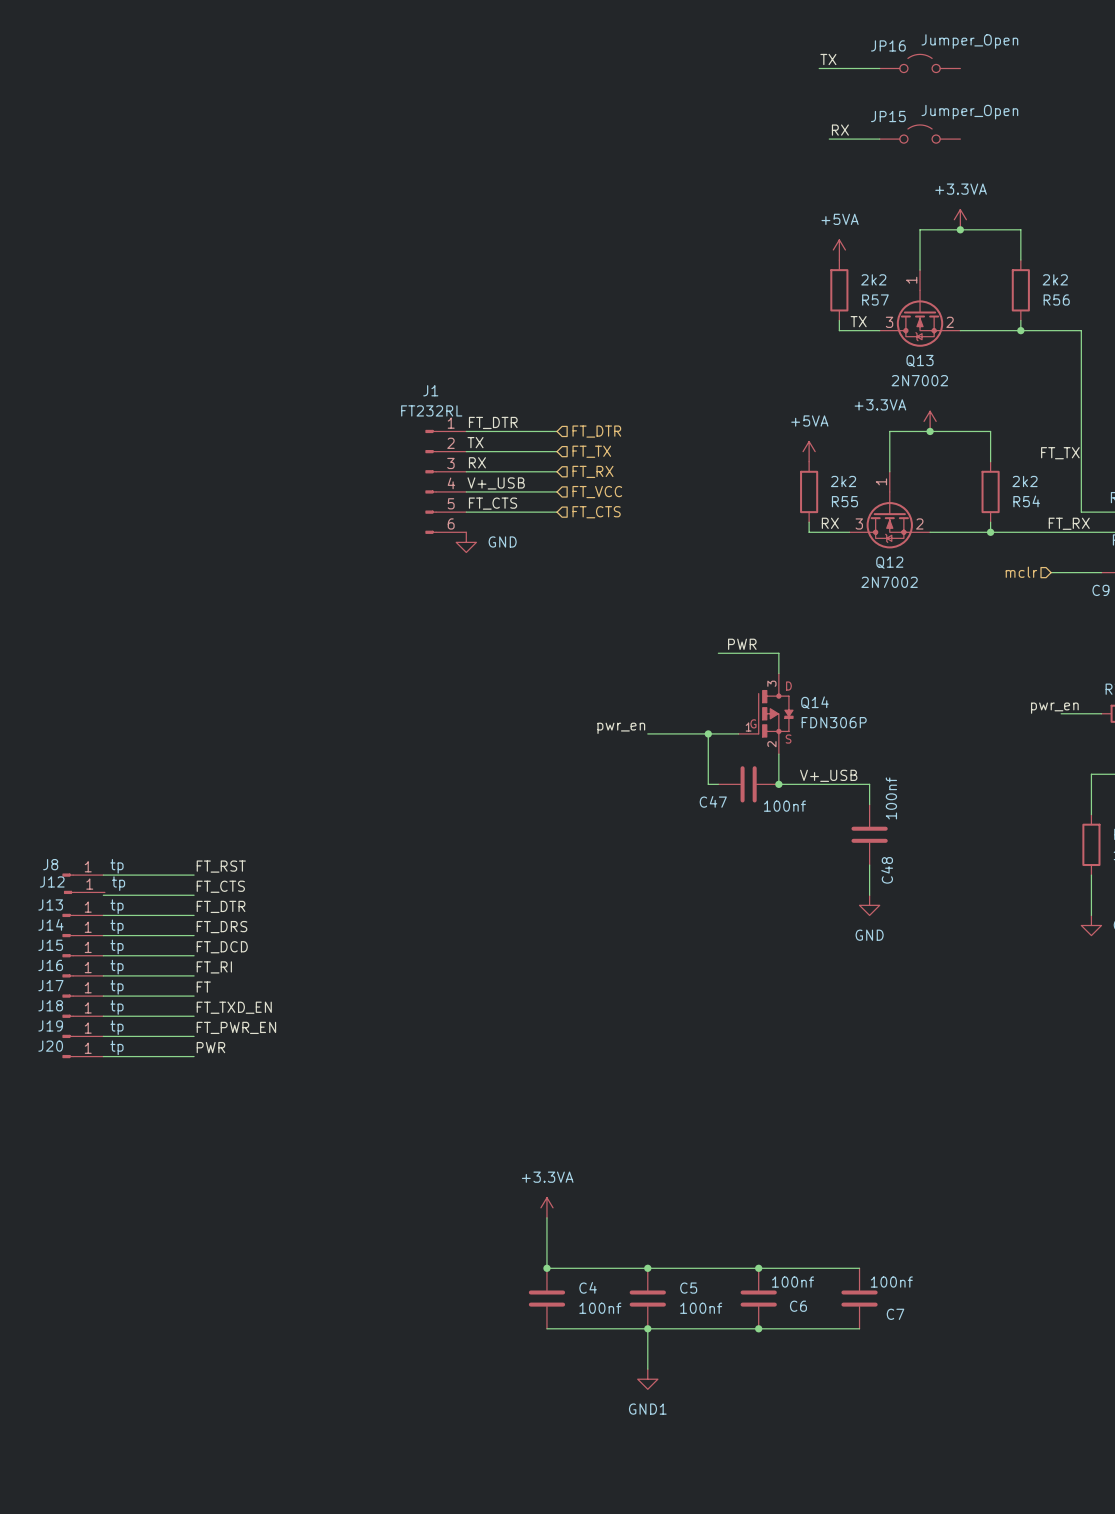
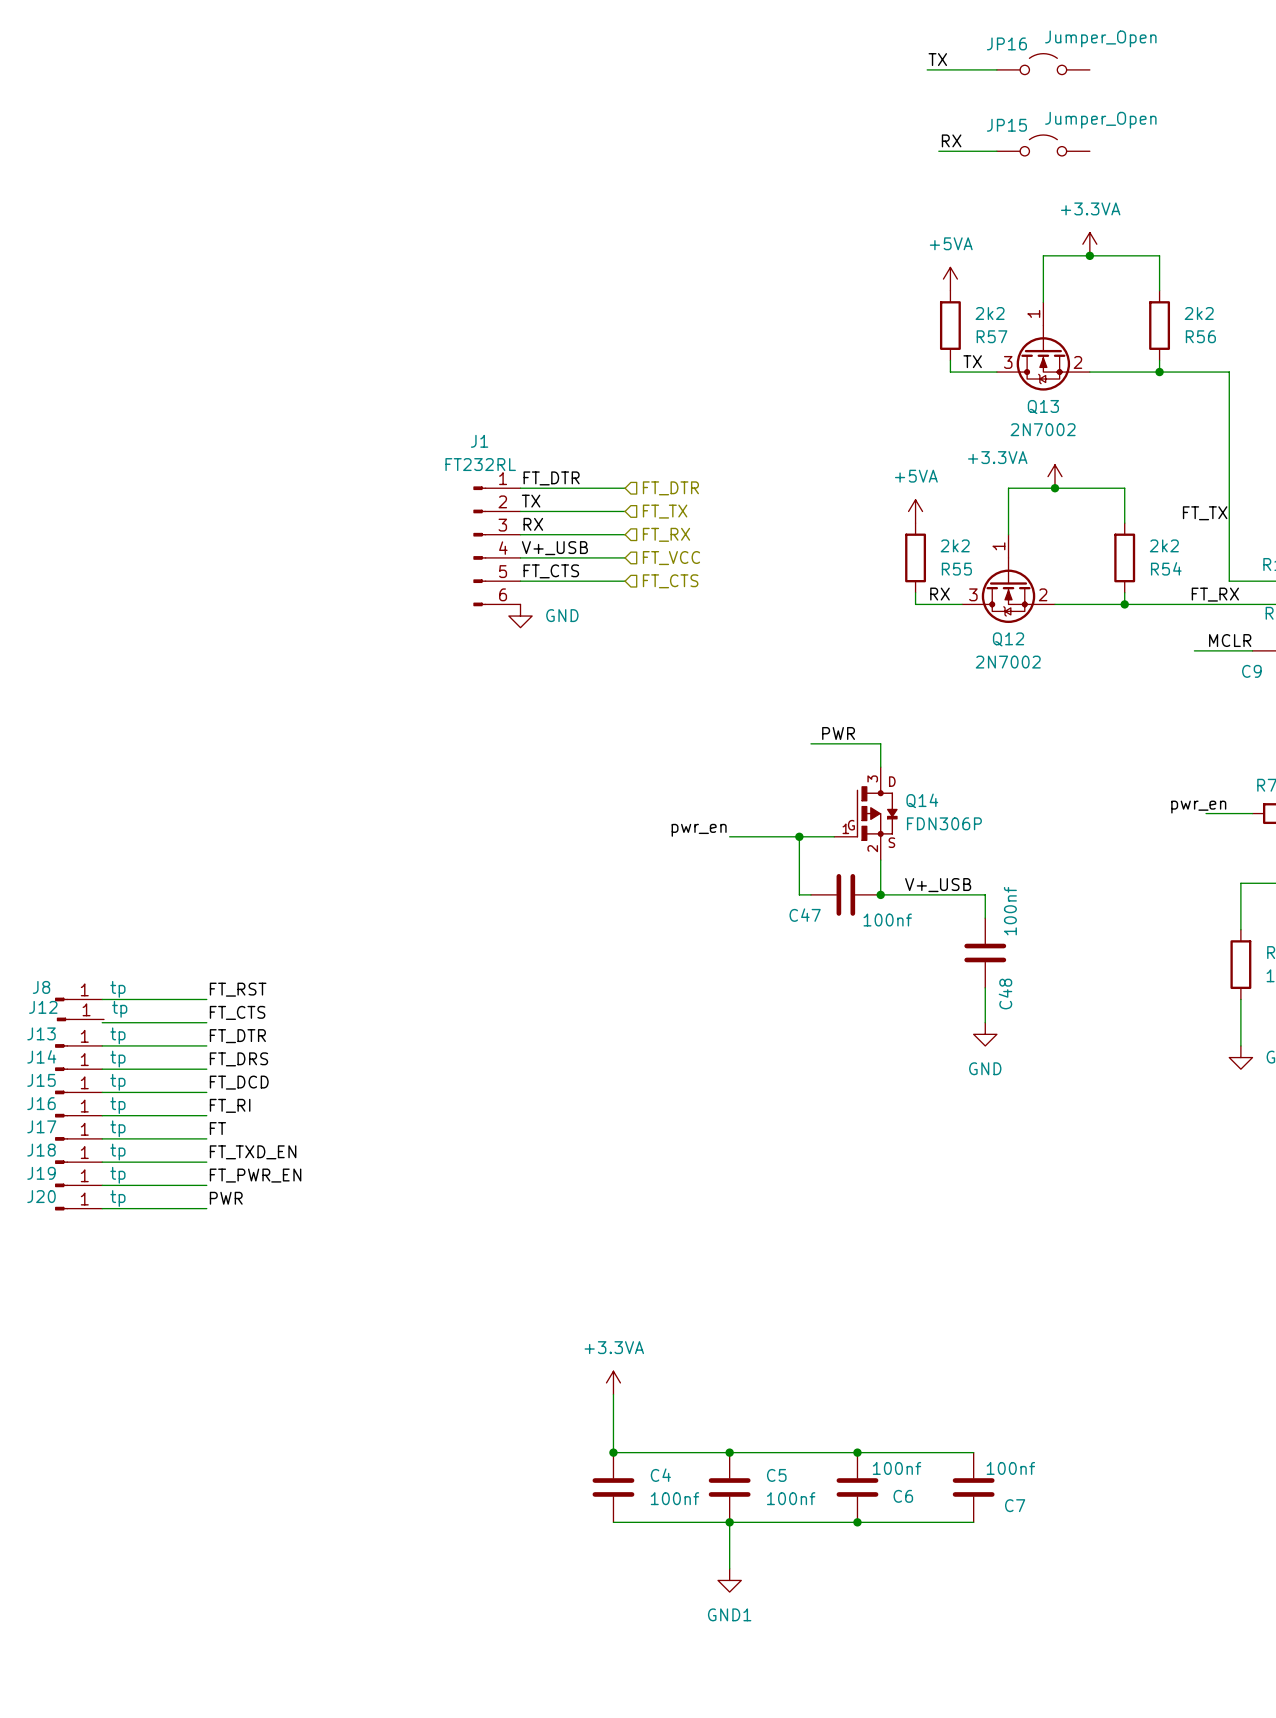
label: none -> MCLR (1230, 640)
hierarchical label: mclr (1021, 572) -> none

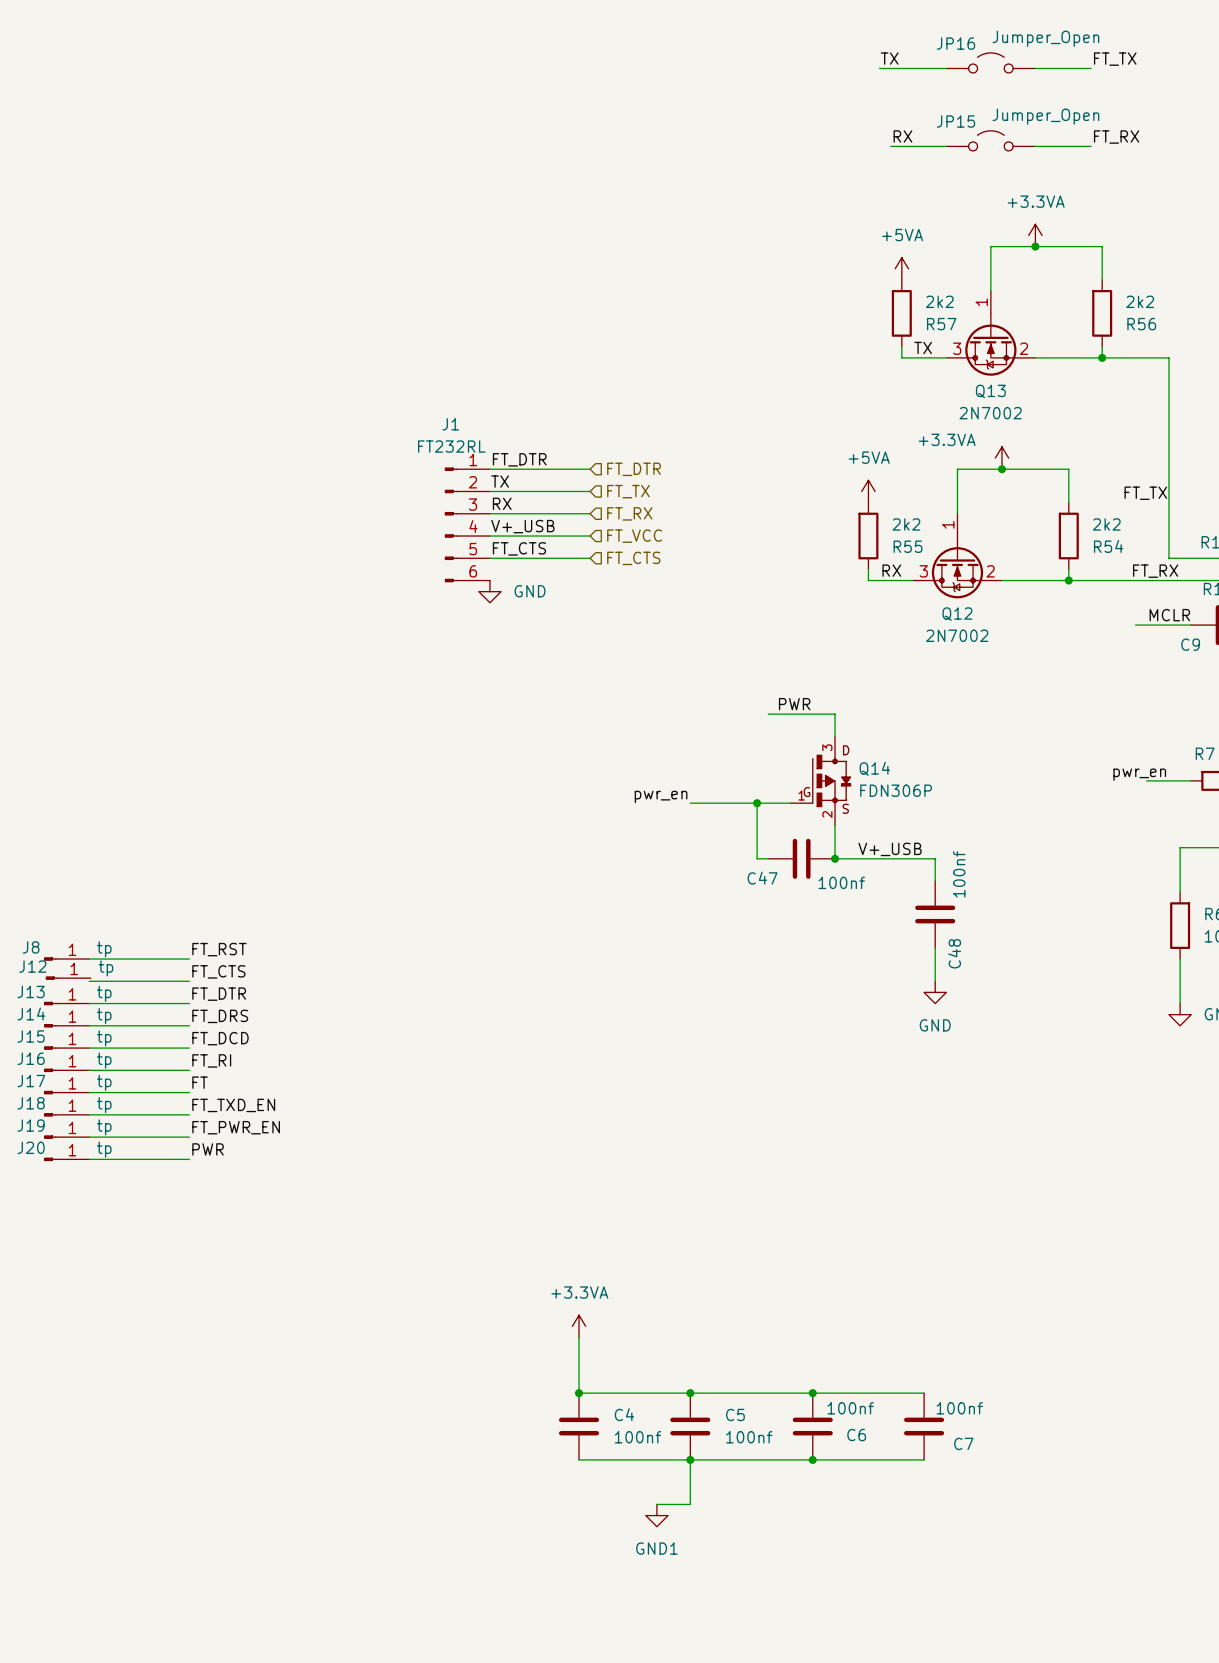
label: none -> FT_TX (1115, 59)
wire: none -> (1035, 68) (1091, 68)
label: none -> FT_RX (1116, 137)
wire: none -> (1035, 146) (1091, 146)
wire: none -> (656, 1504) (690, 1504)
power symbol position: GND1 (729, 1580) -> GND1 (656, 1515)

